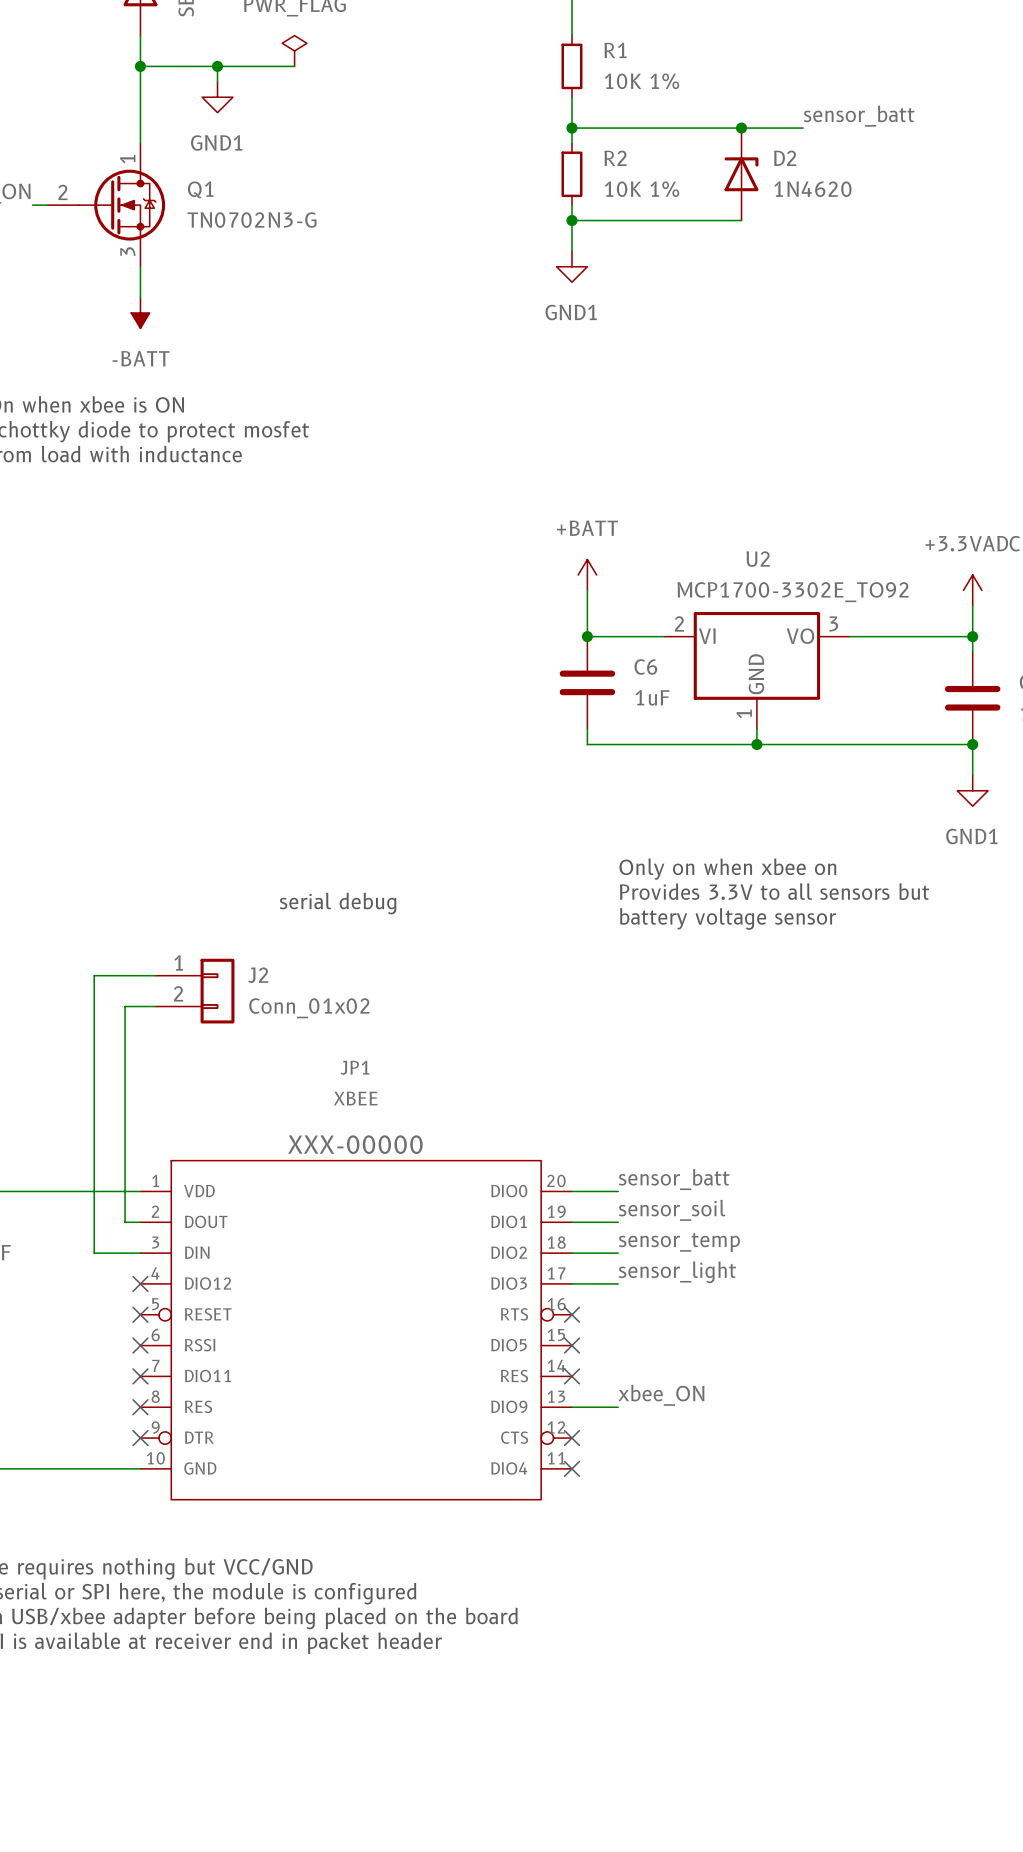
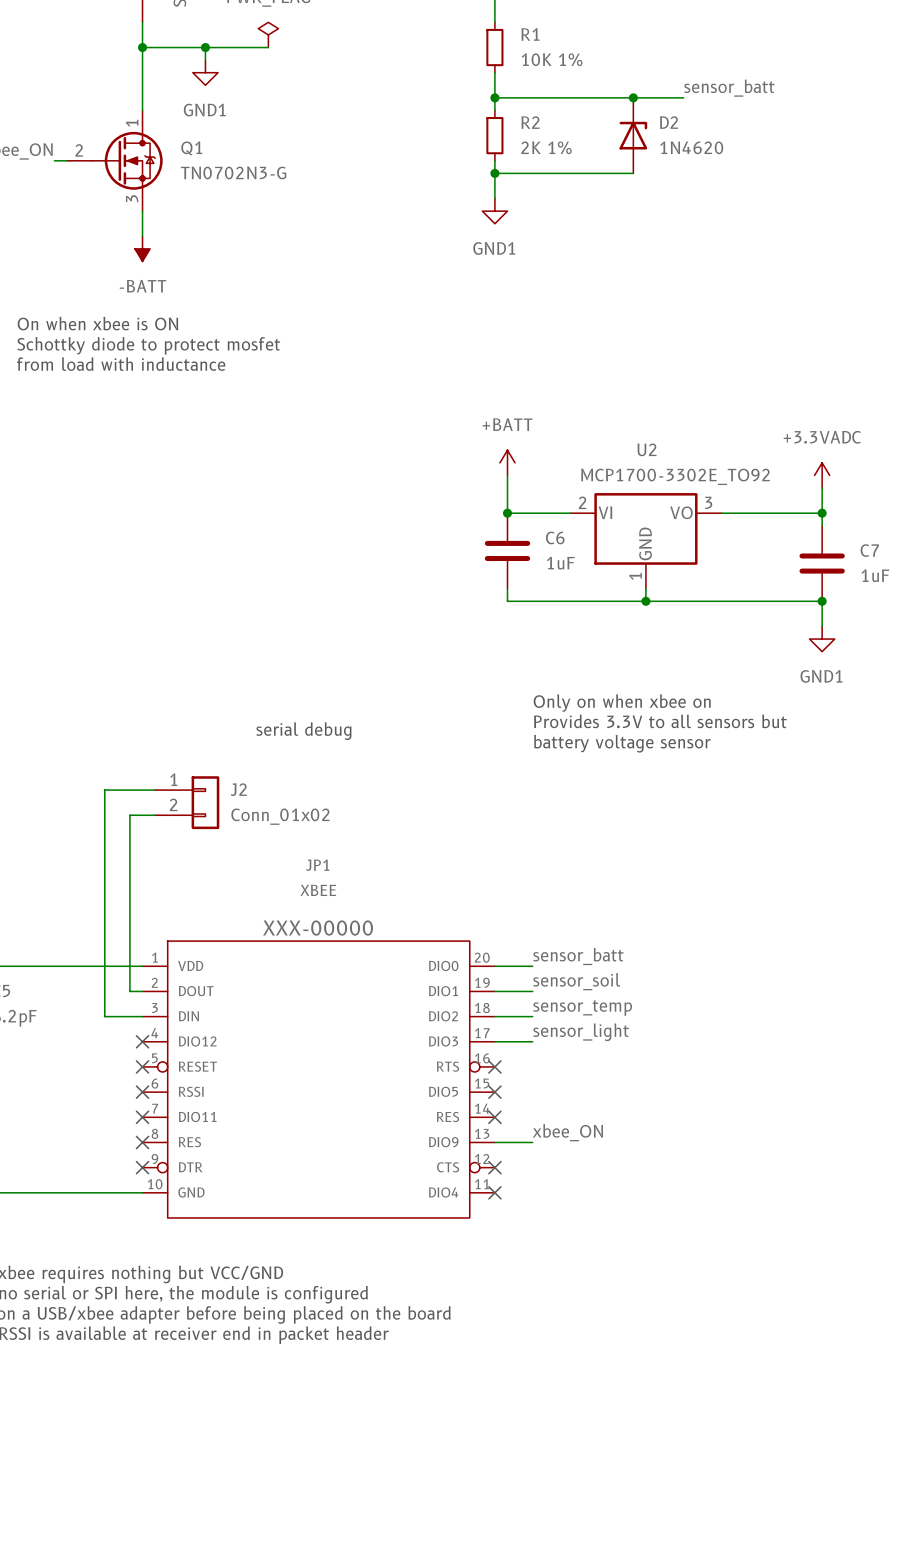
R2 value: 10K 1% (641, 189) -> 2K 1% (546, 147)

